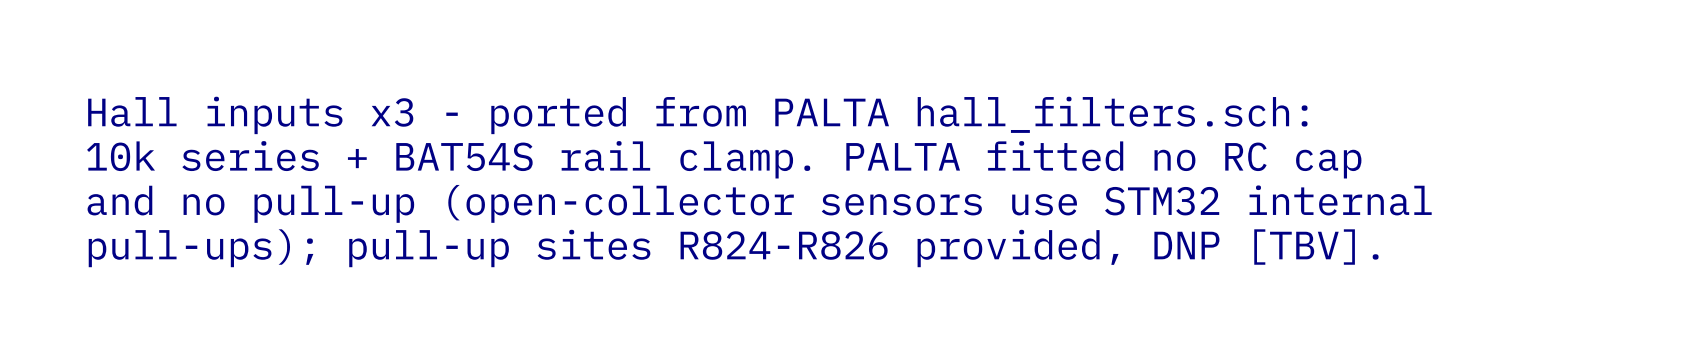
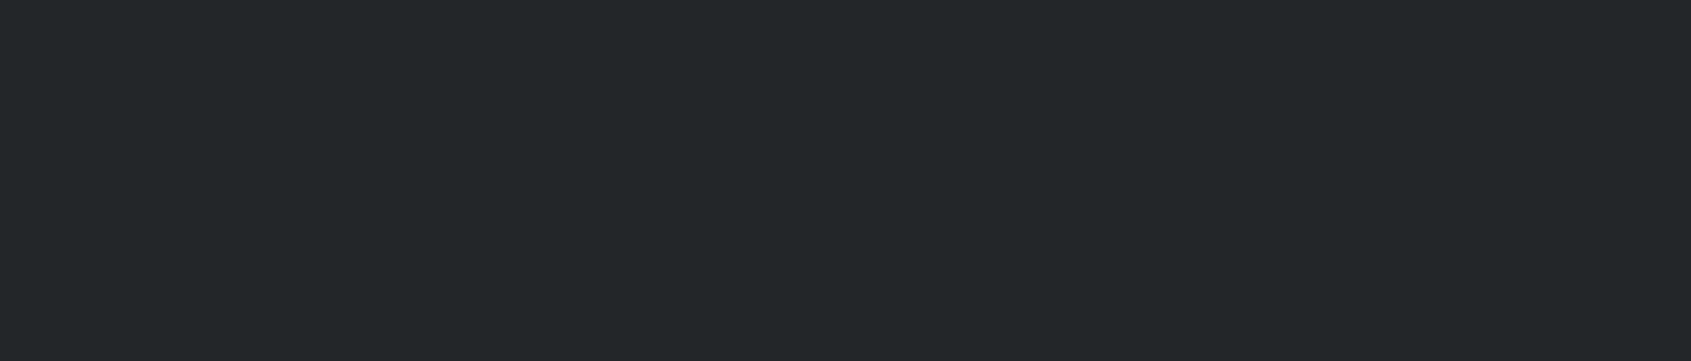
text: Hall inputs x3 - ported from PALTA hall_filters.sch: (697, 115) -> none
text: 10k series + BAT54S rail clamp. PALTA fitted no RC cap (724, 159) -> none
text: and no pull-up (open-collector sensors use STM32 internal (759, 203) -> none
text: pull-ups); pull-up sites R824-R826 provided, DNP [TBV]. (733, 248) -> none

